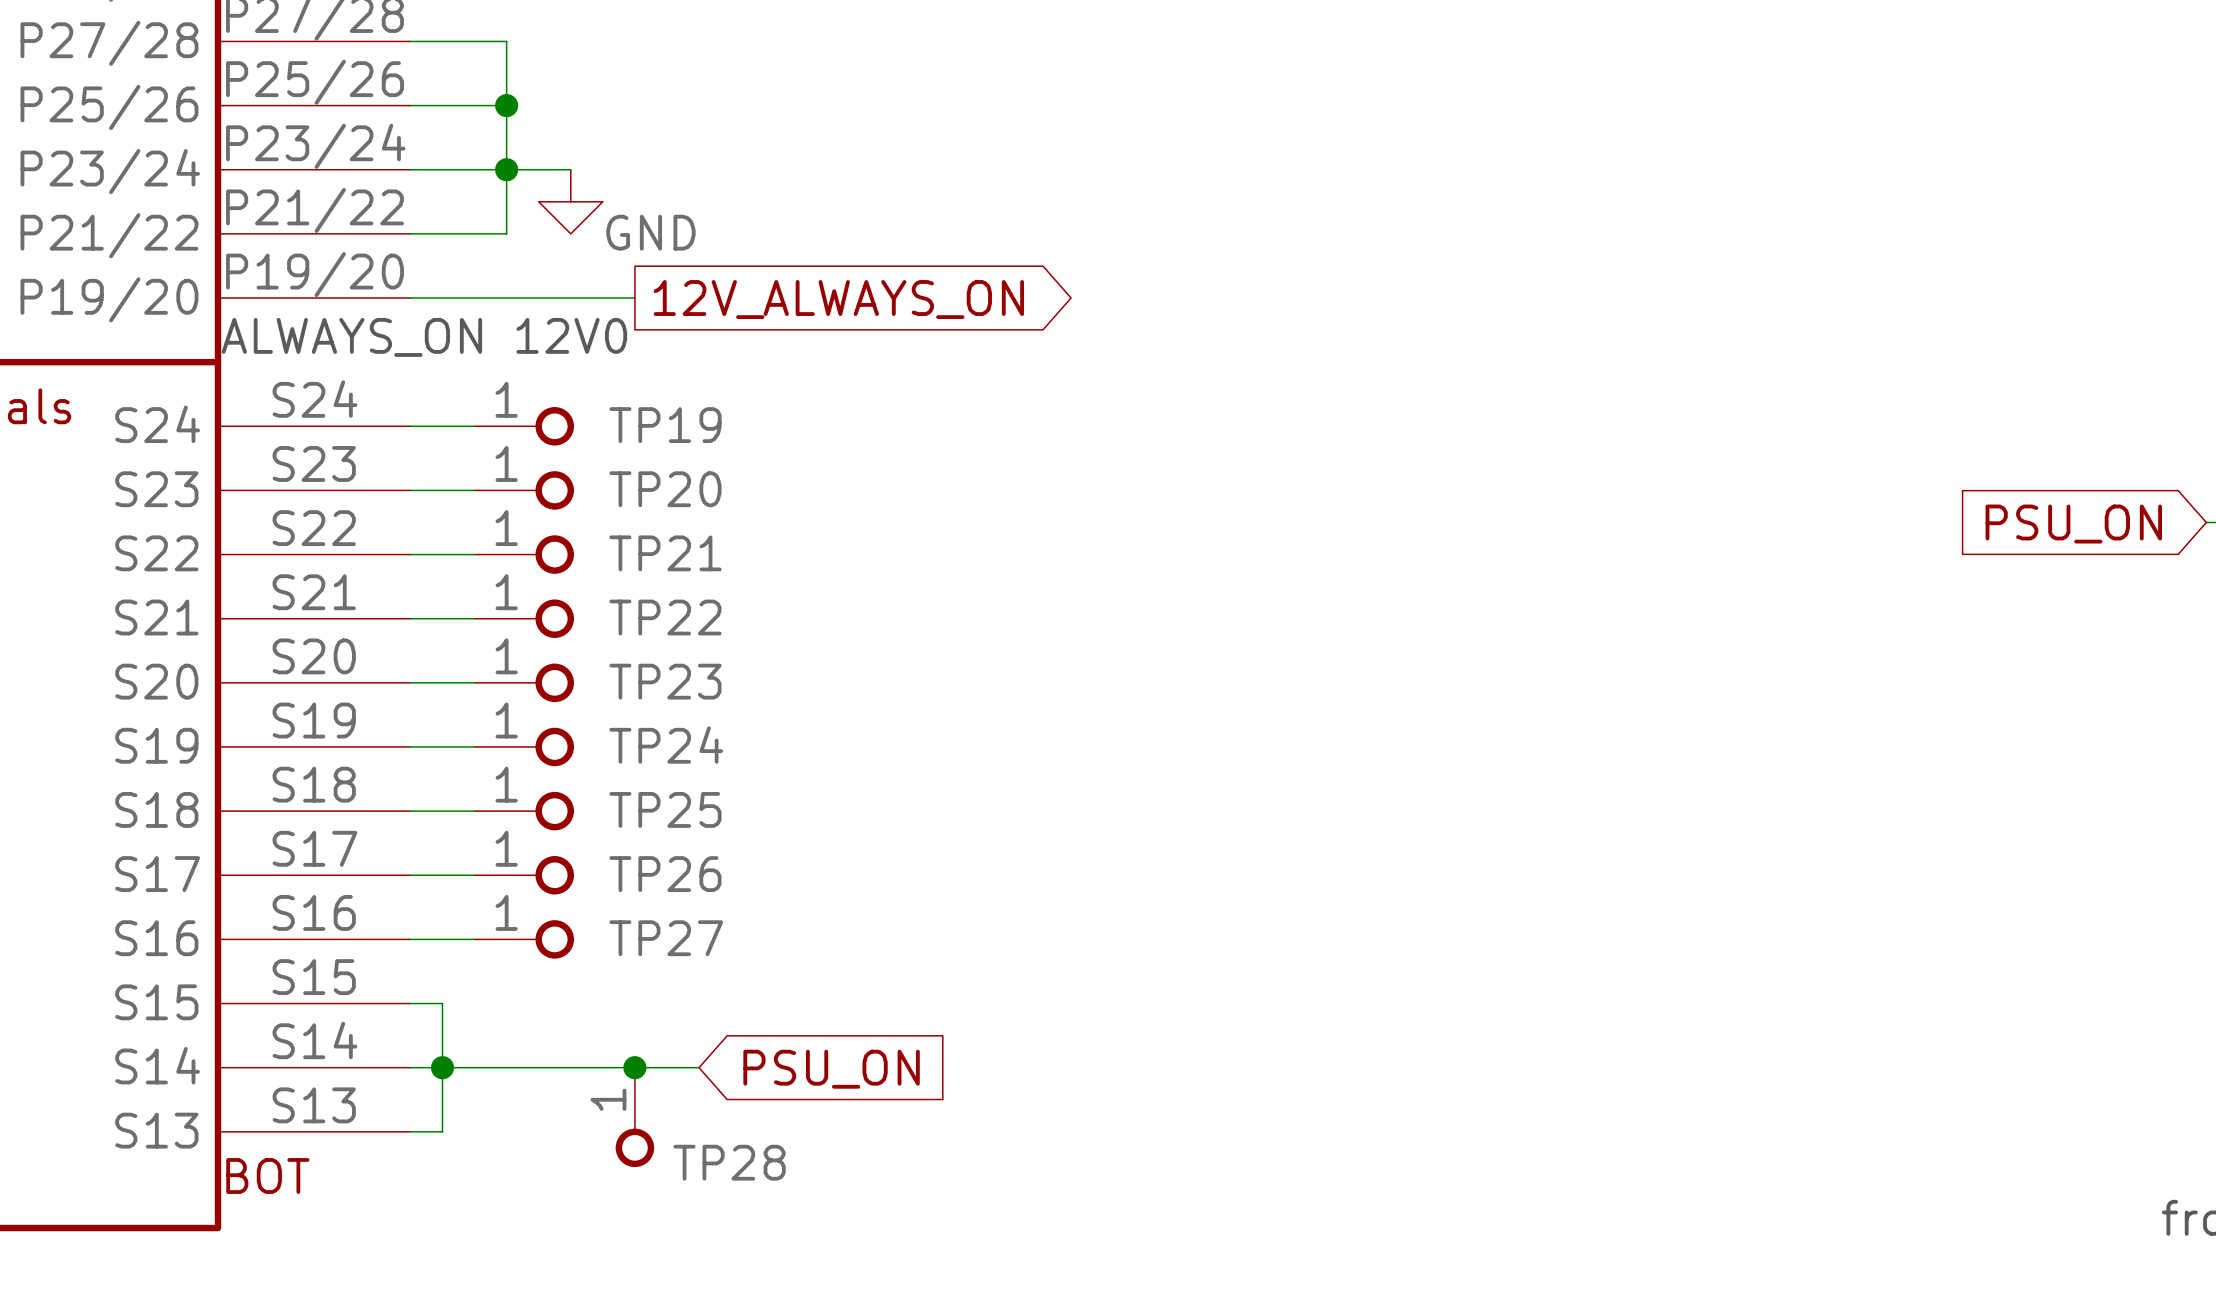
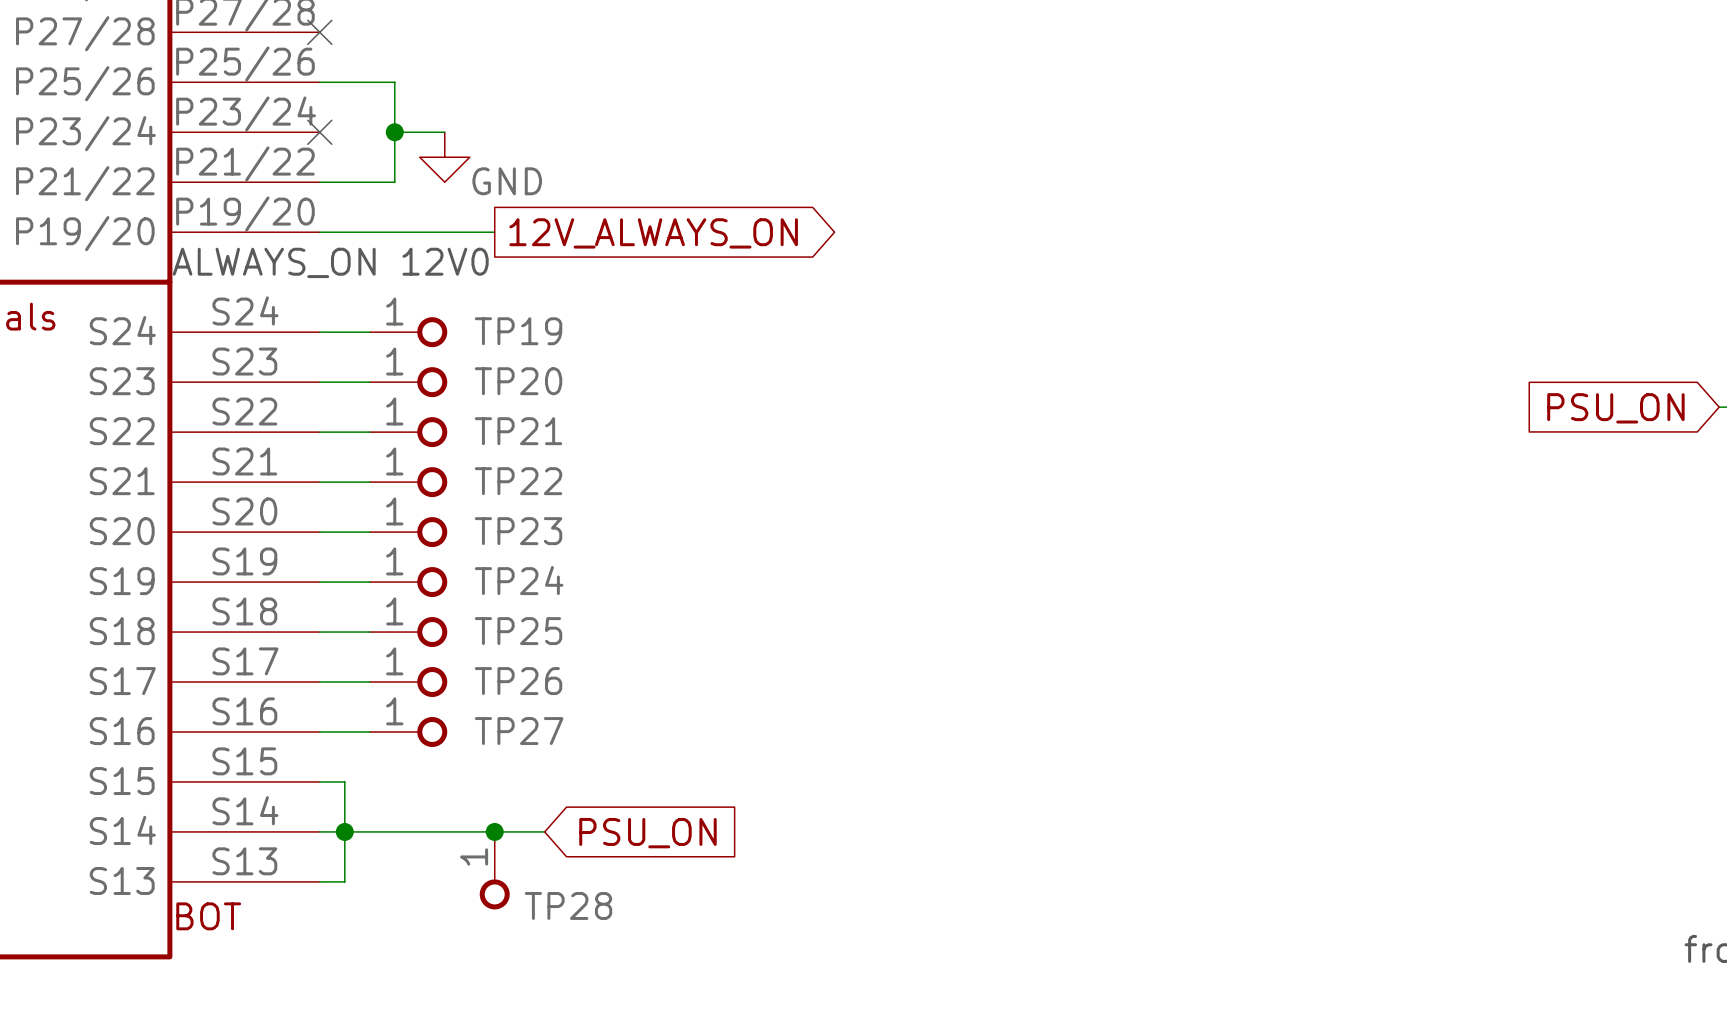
wire: (410, 41) (506, 41) (506, 105) -> none
no-connect mark: none -> (319, 32)
junction: (506, 105) -> none
wire: (410, 169) (506, 169) -> none
no-connect mark: none -> (319, 132)

